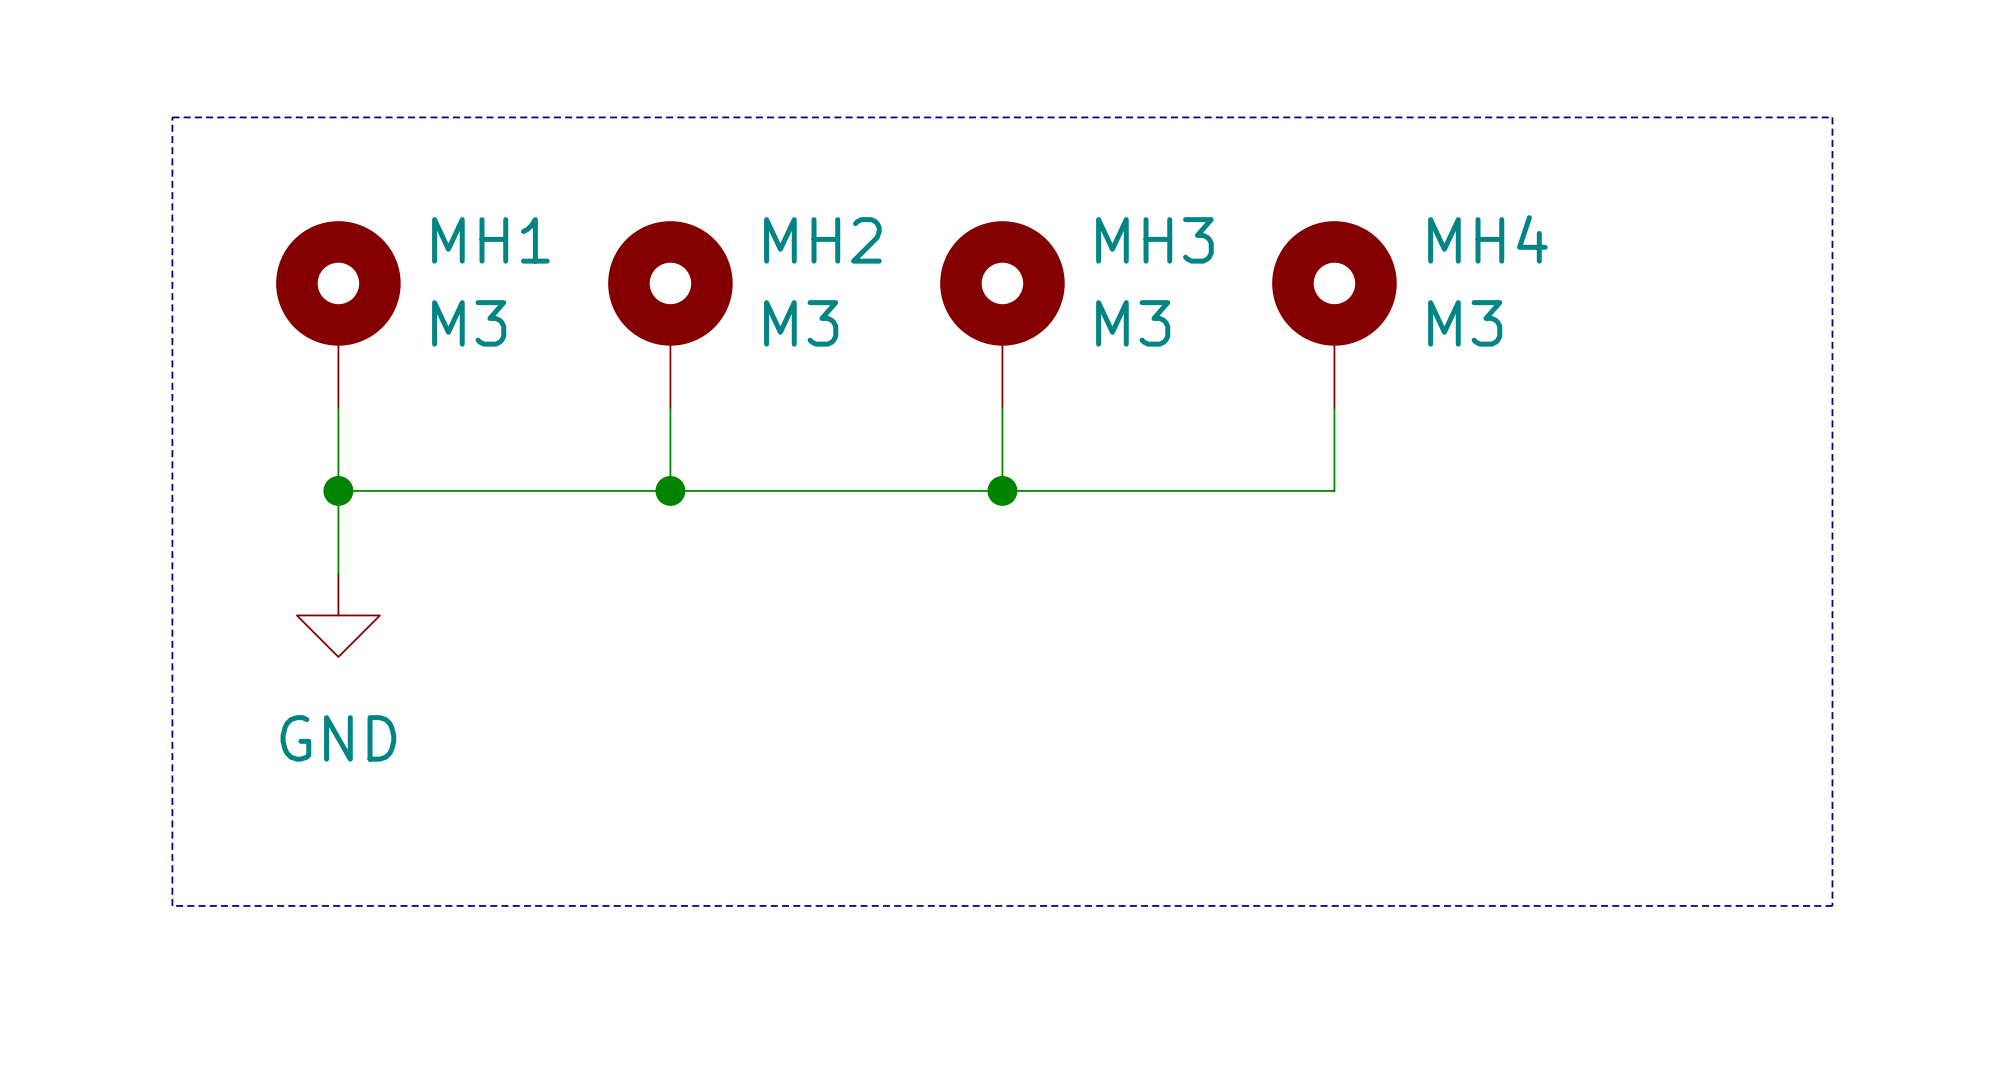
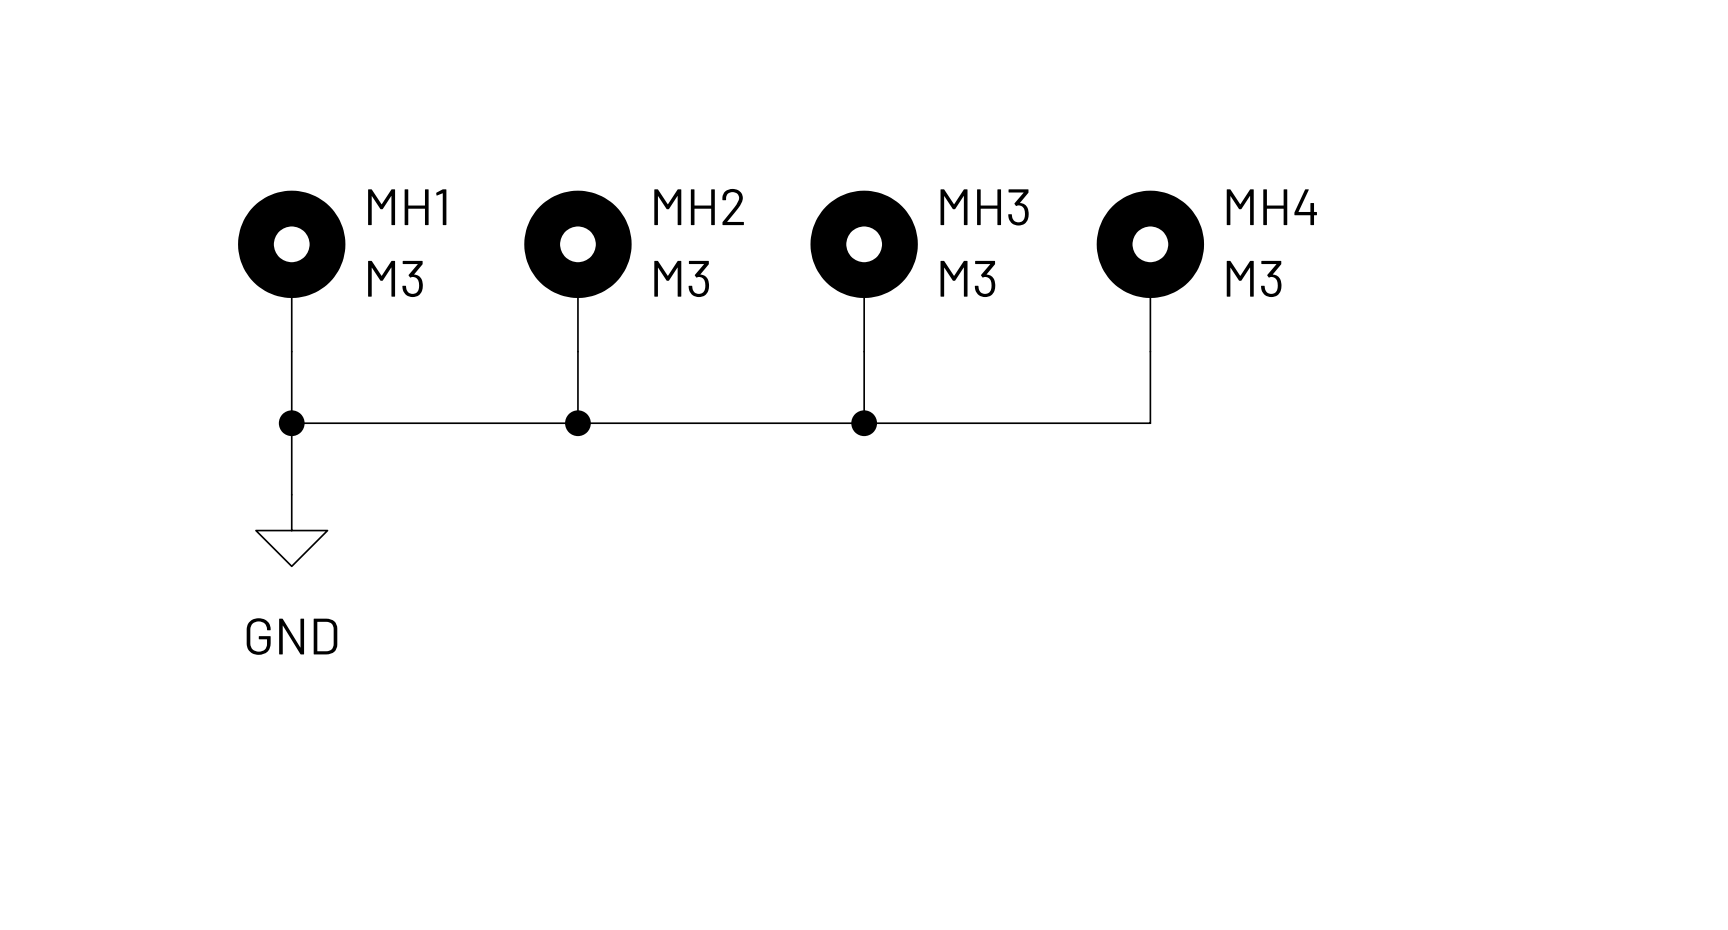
line: (172, 117) (1832, 117) (1832, 905) (172, 905) (172, 117) -> none

